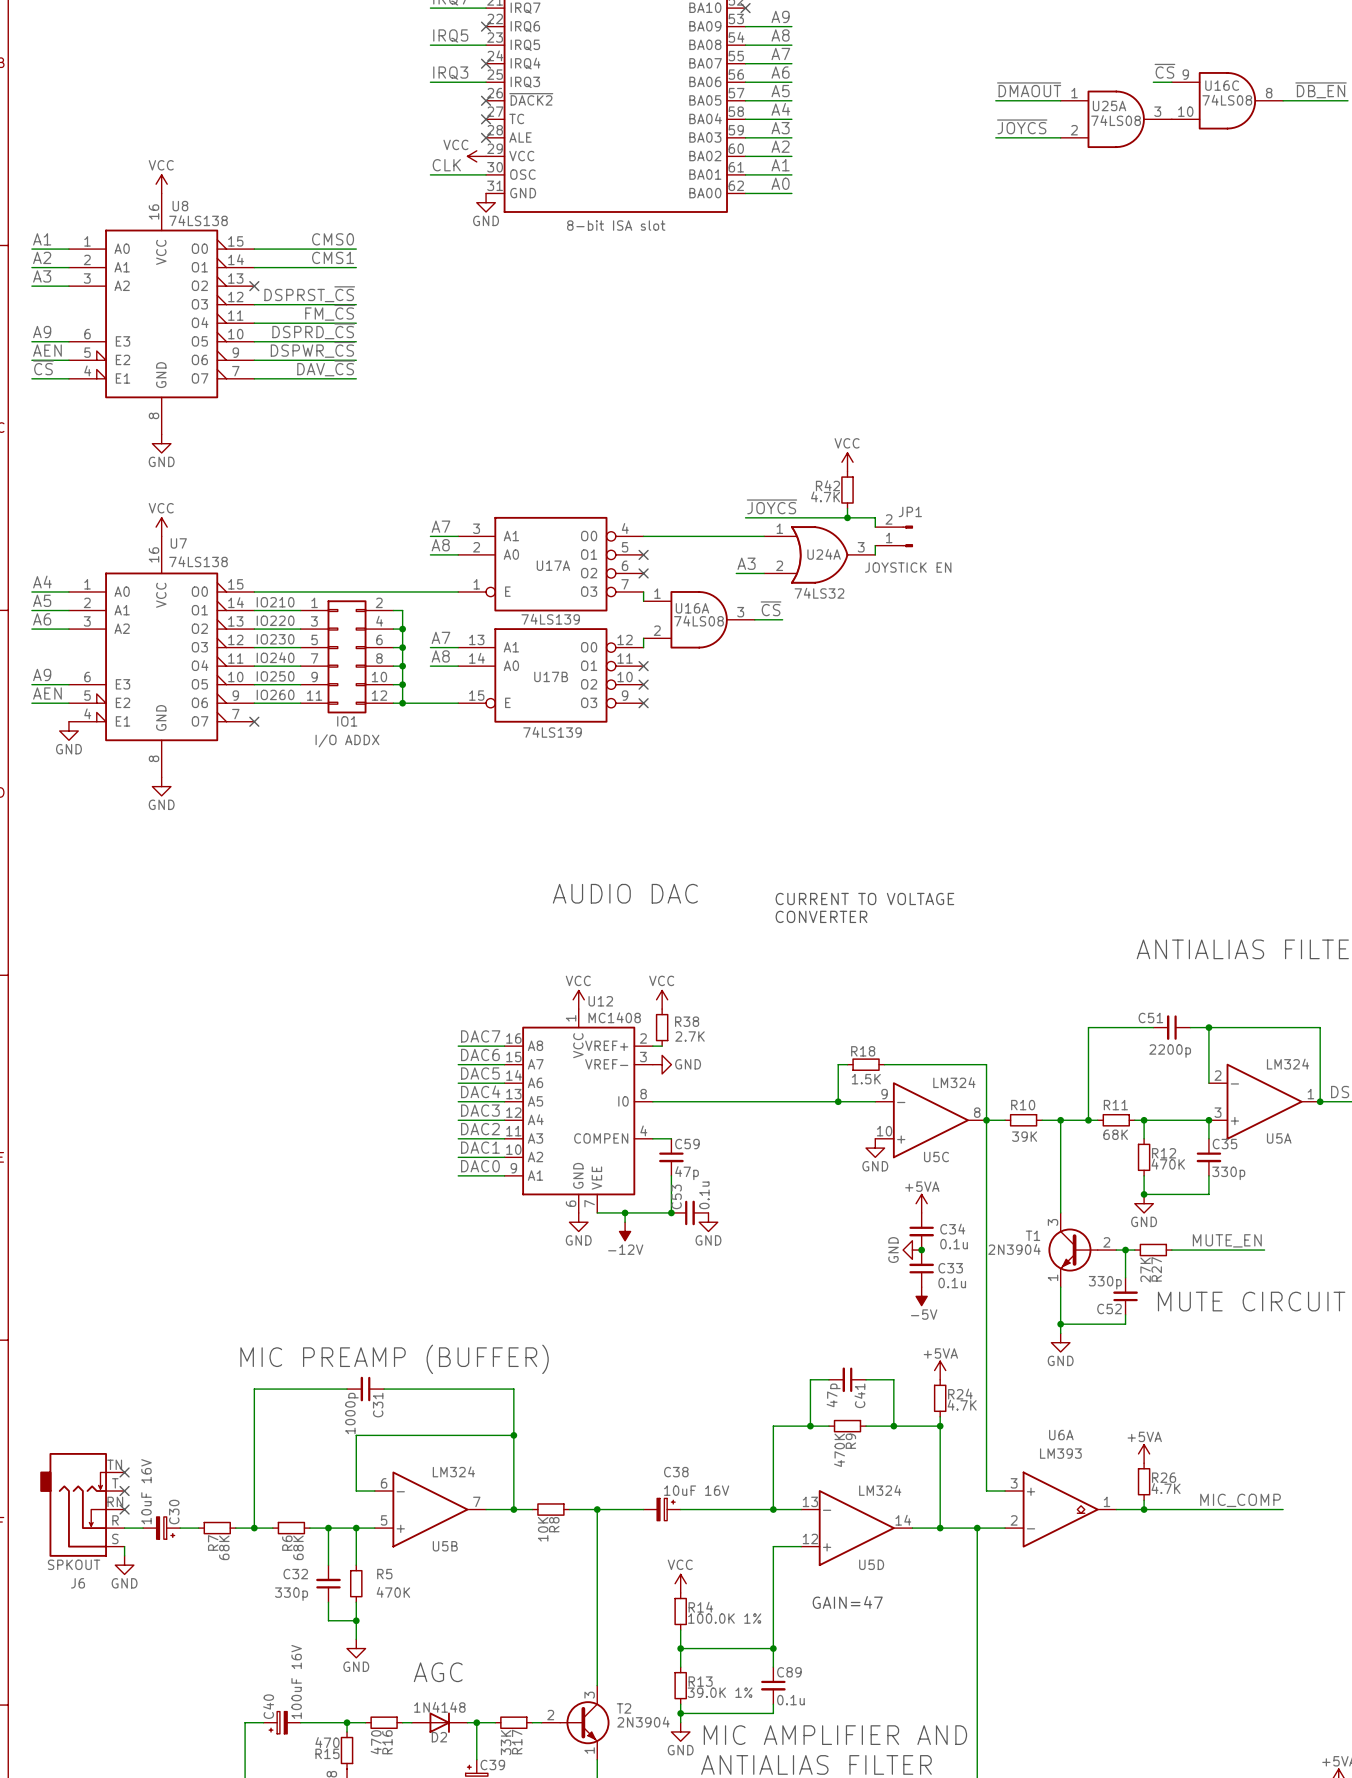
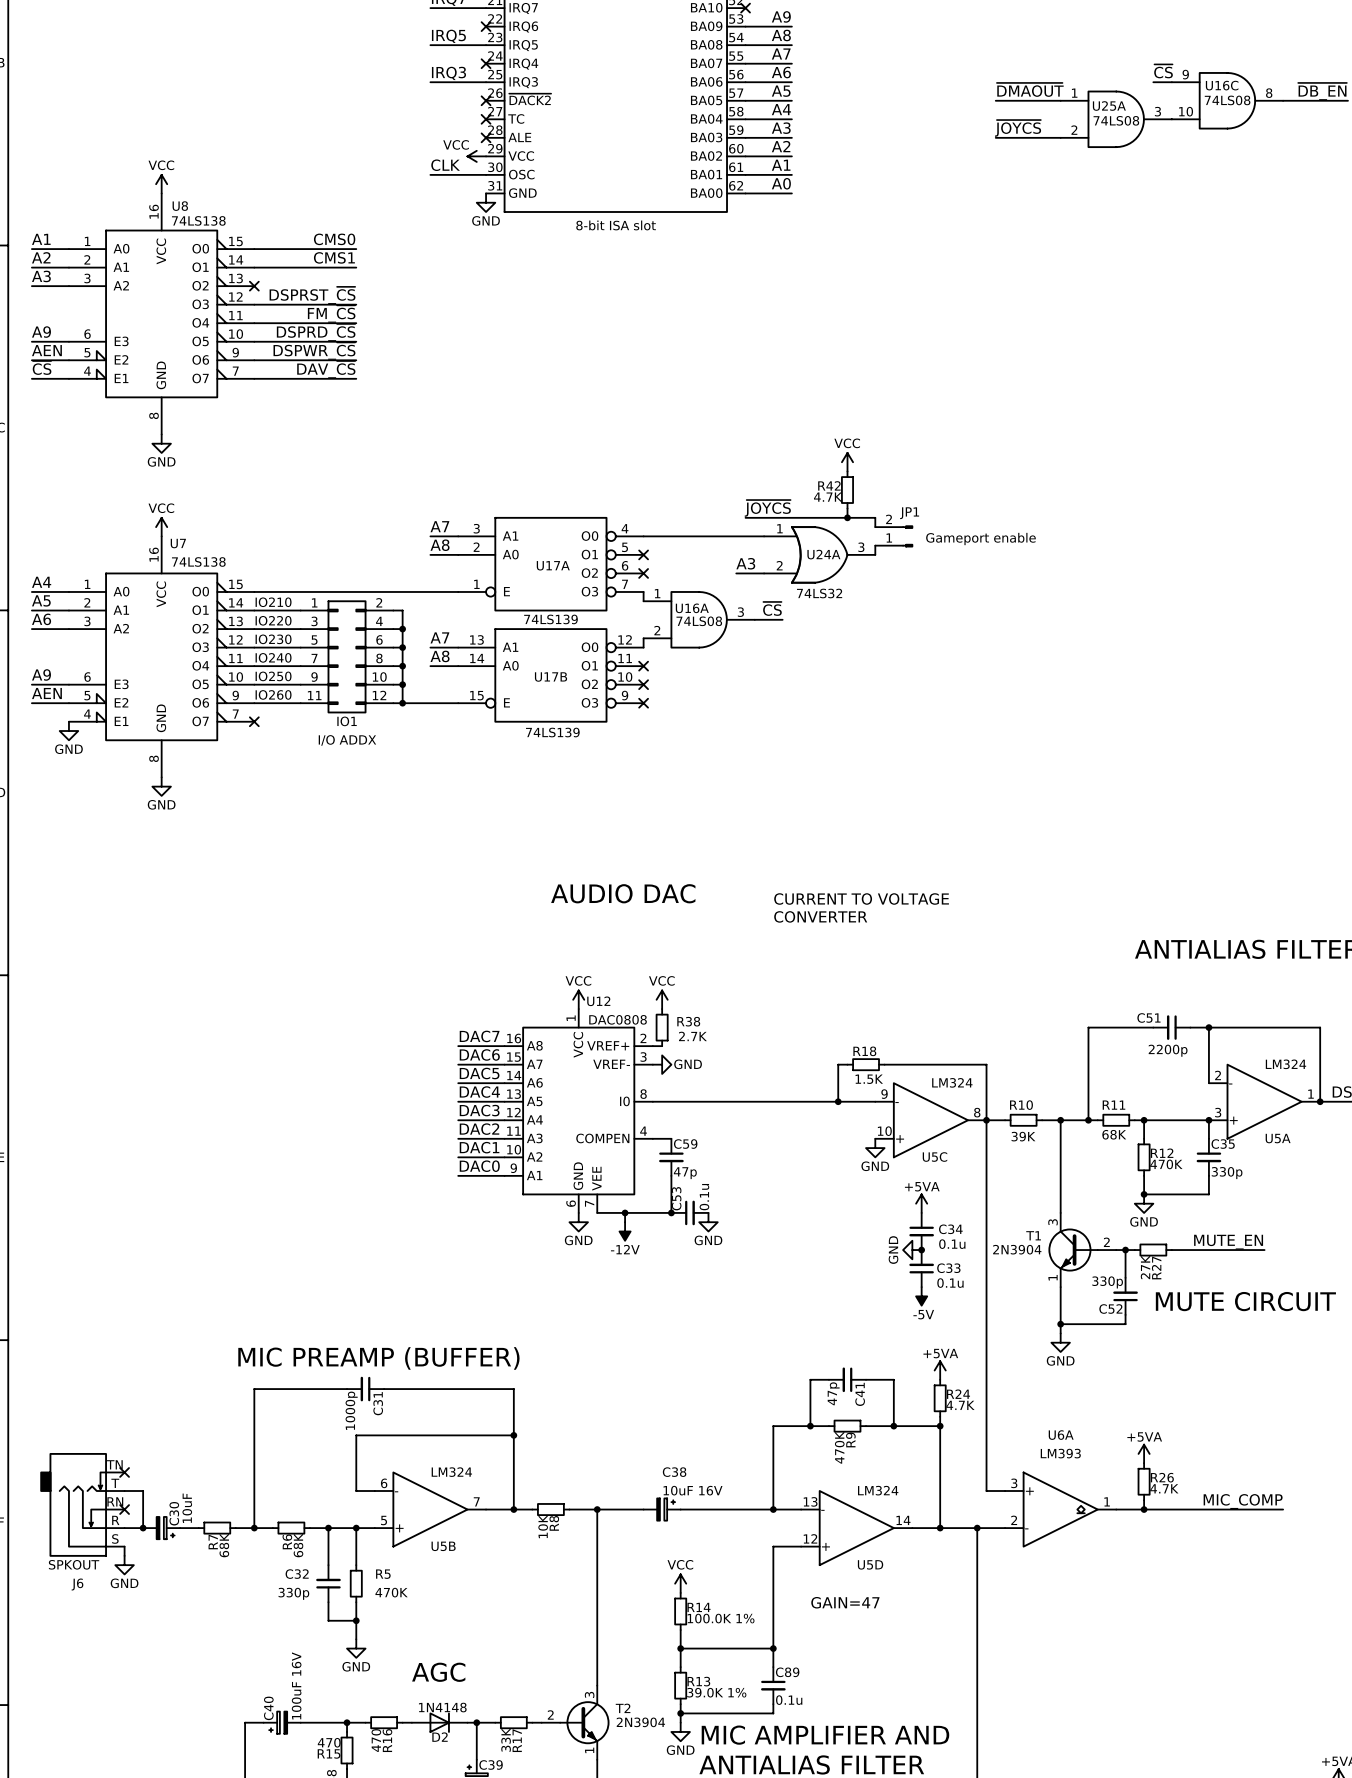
JP1 value: JOYSTICK EN (908, 567) -> Gameport enable (980, 539)
U12 value: MC1408 (614, 1017) -> DAC0808 (618, 1019)
wire: none -> (124, 1491) (143, 1491) (143, 1528)
no-connect mark: (124, 1491) -> none
C30 value: 10uF 16V (146, 1491) -> 10uF (187, 1508)
junction: none -> (143, 1528)

